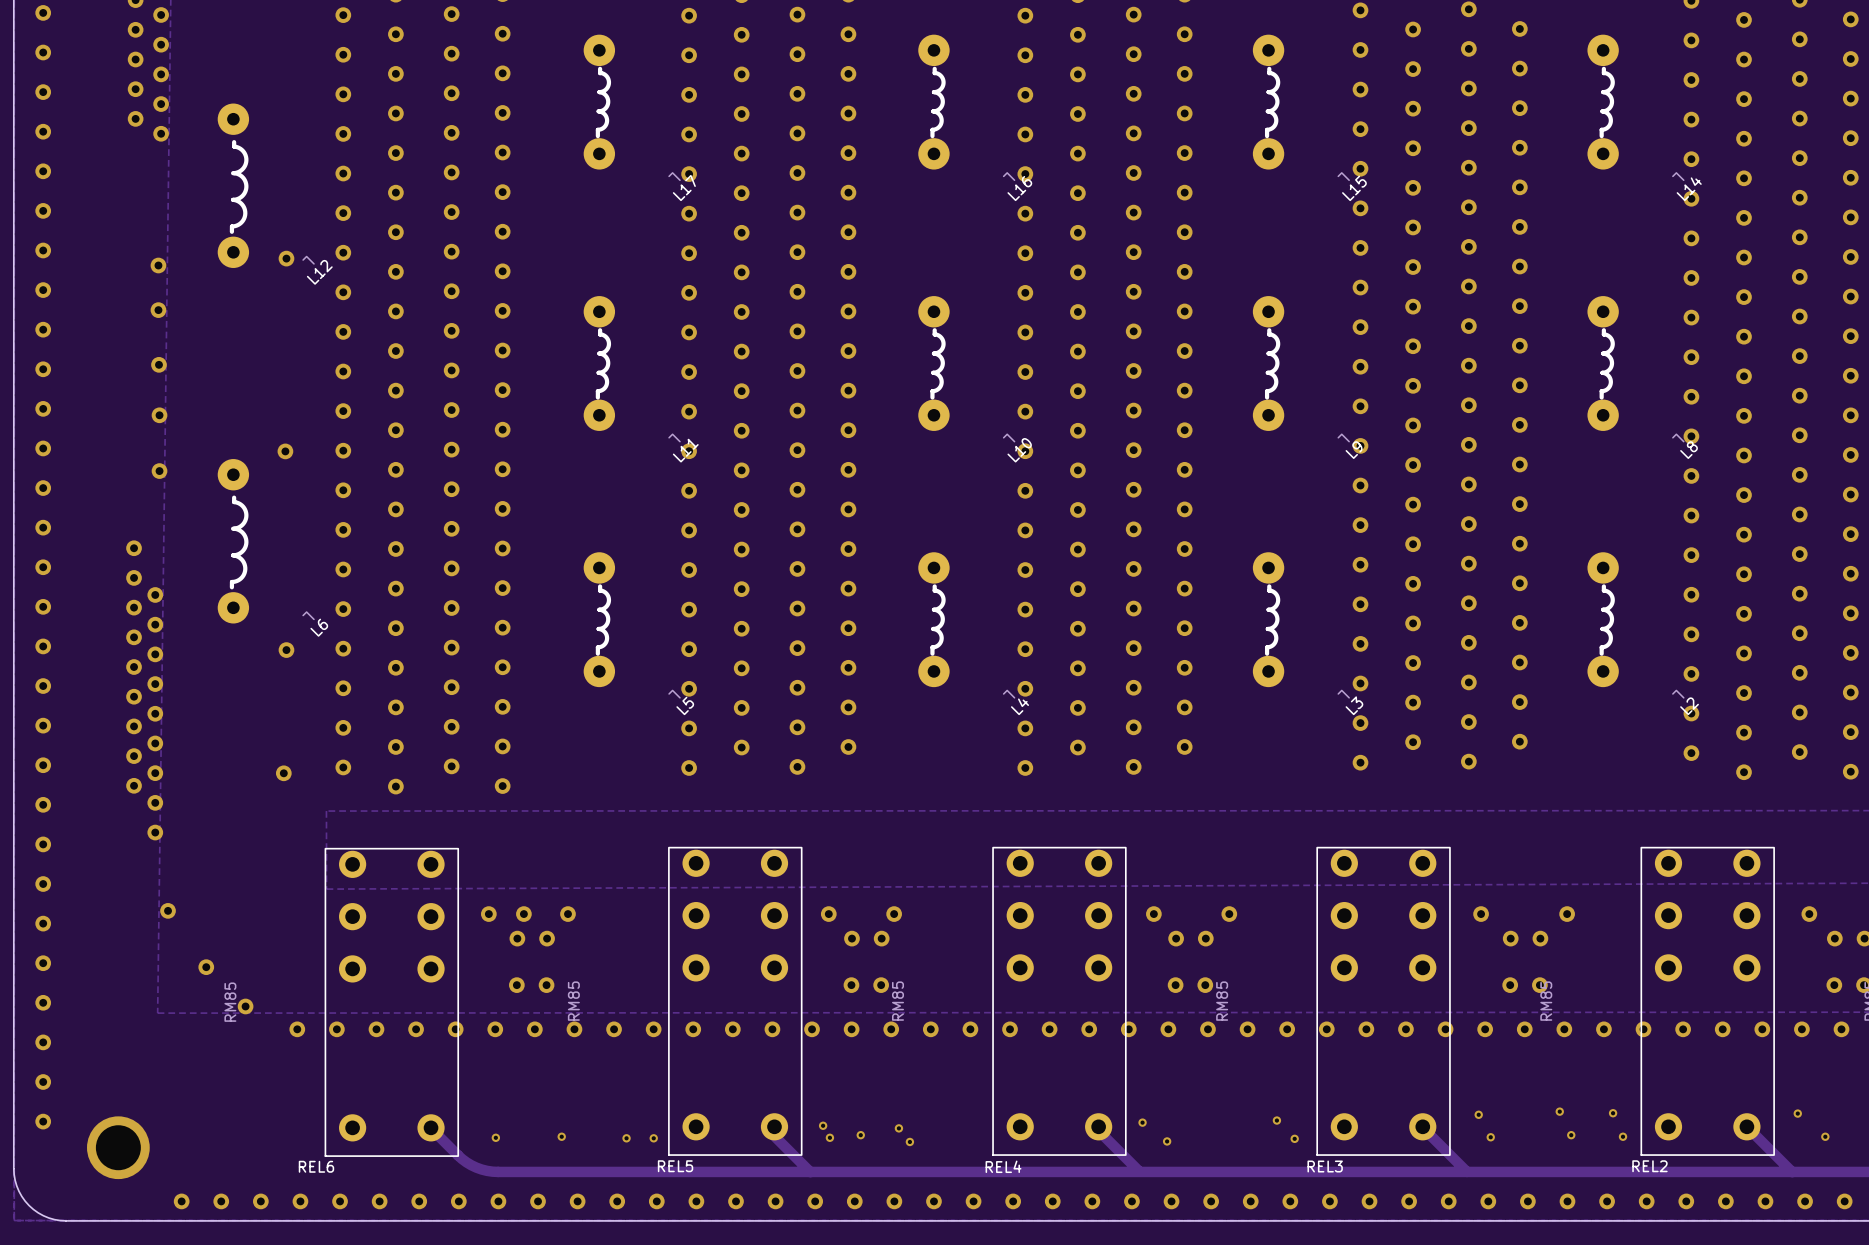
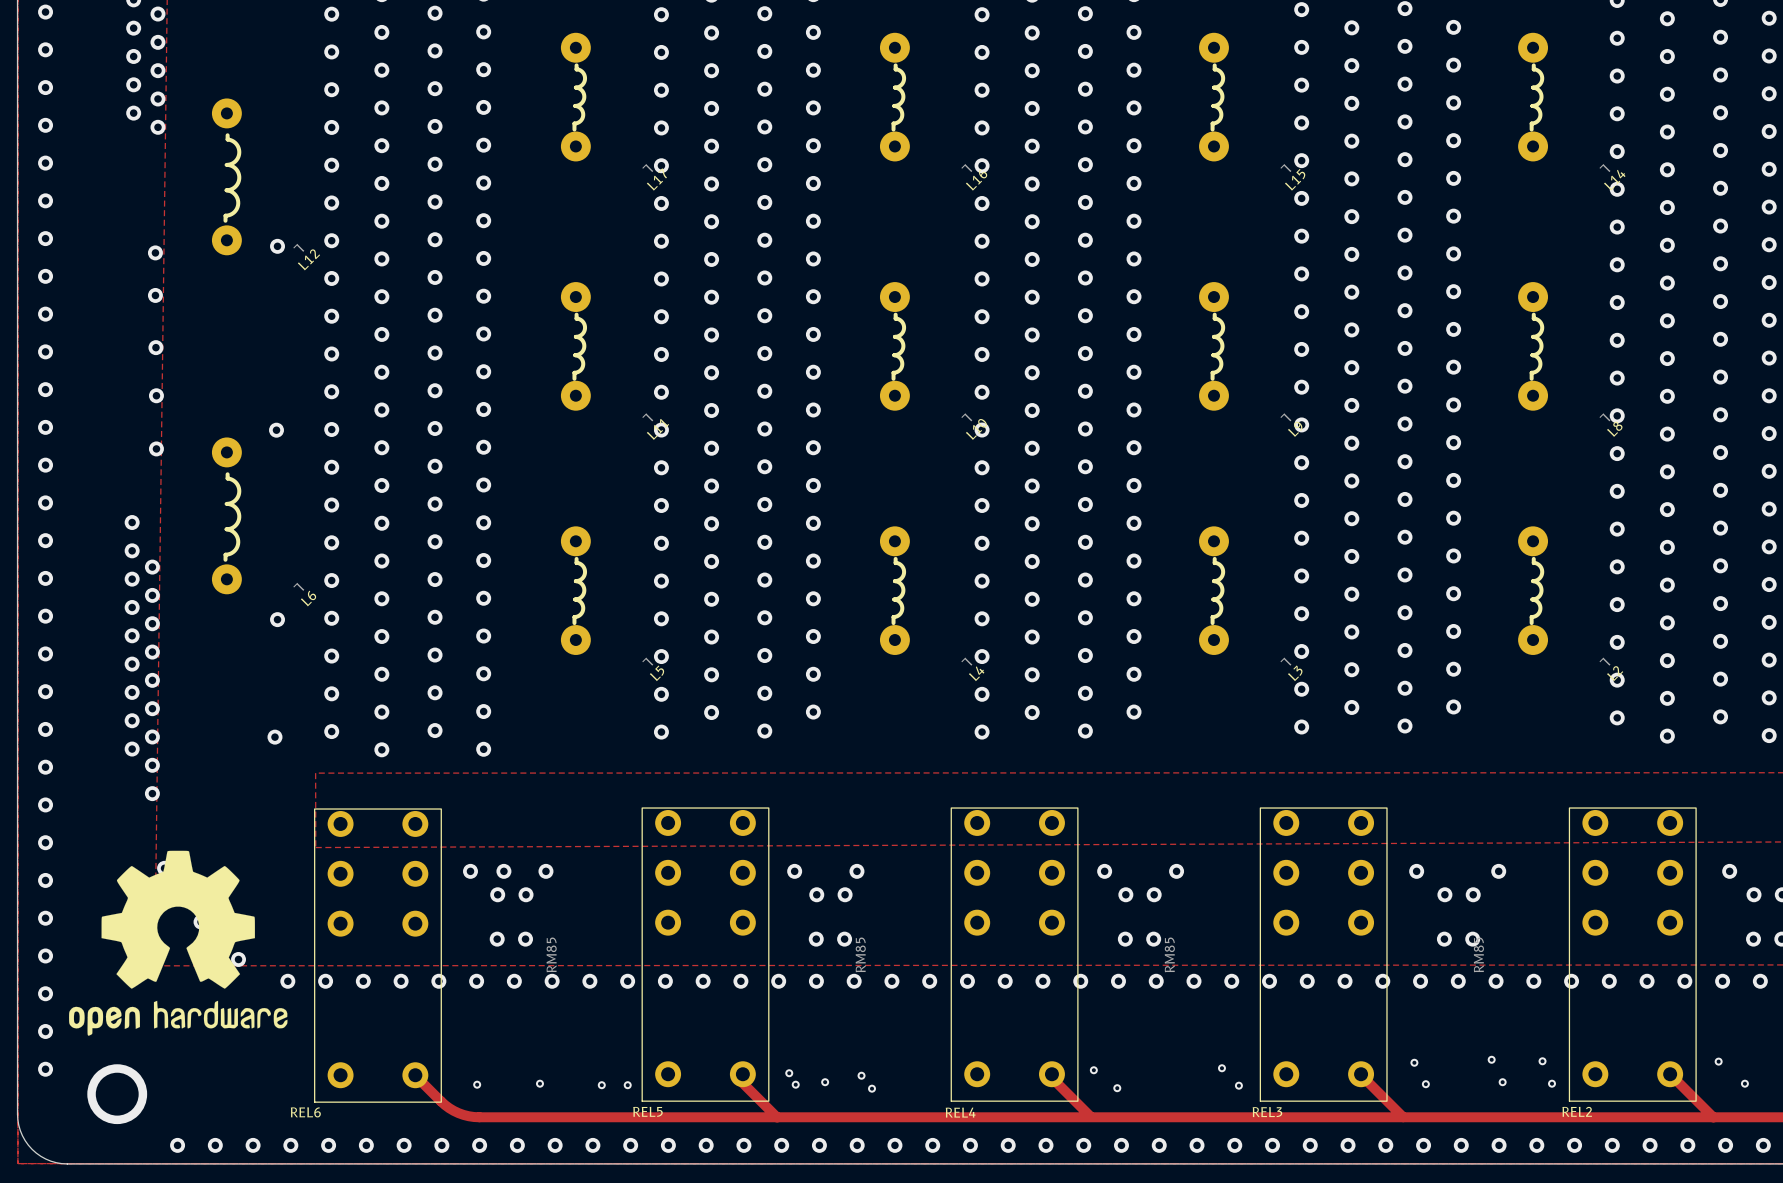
drawing: none -> [69, 850, 288, 1036]

